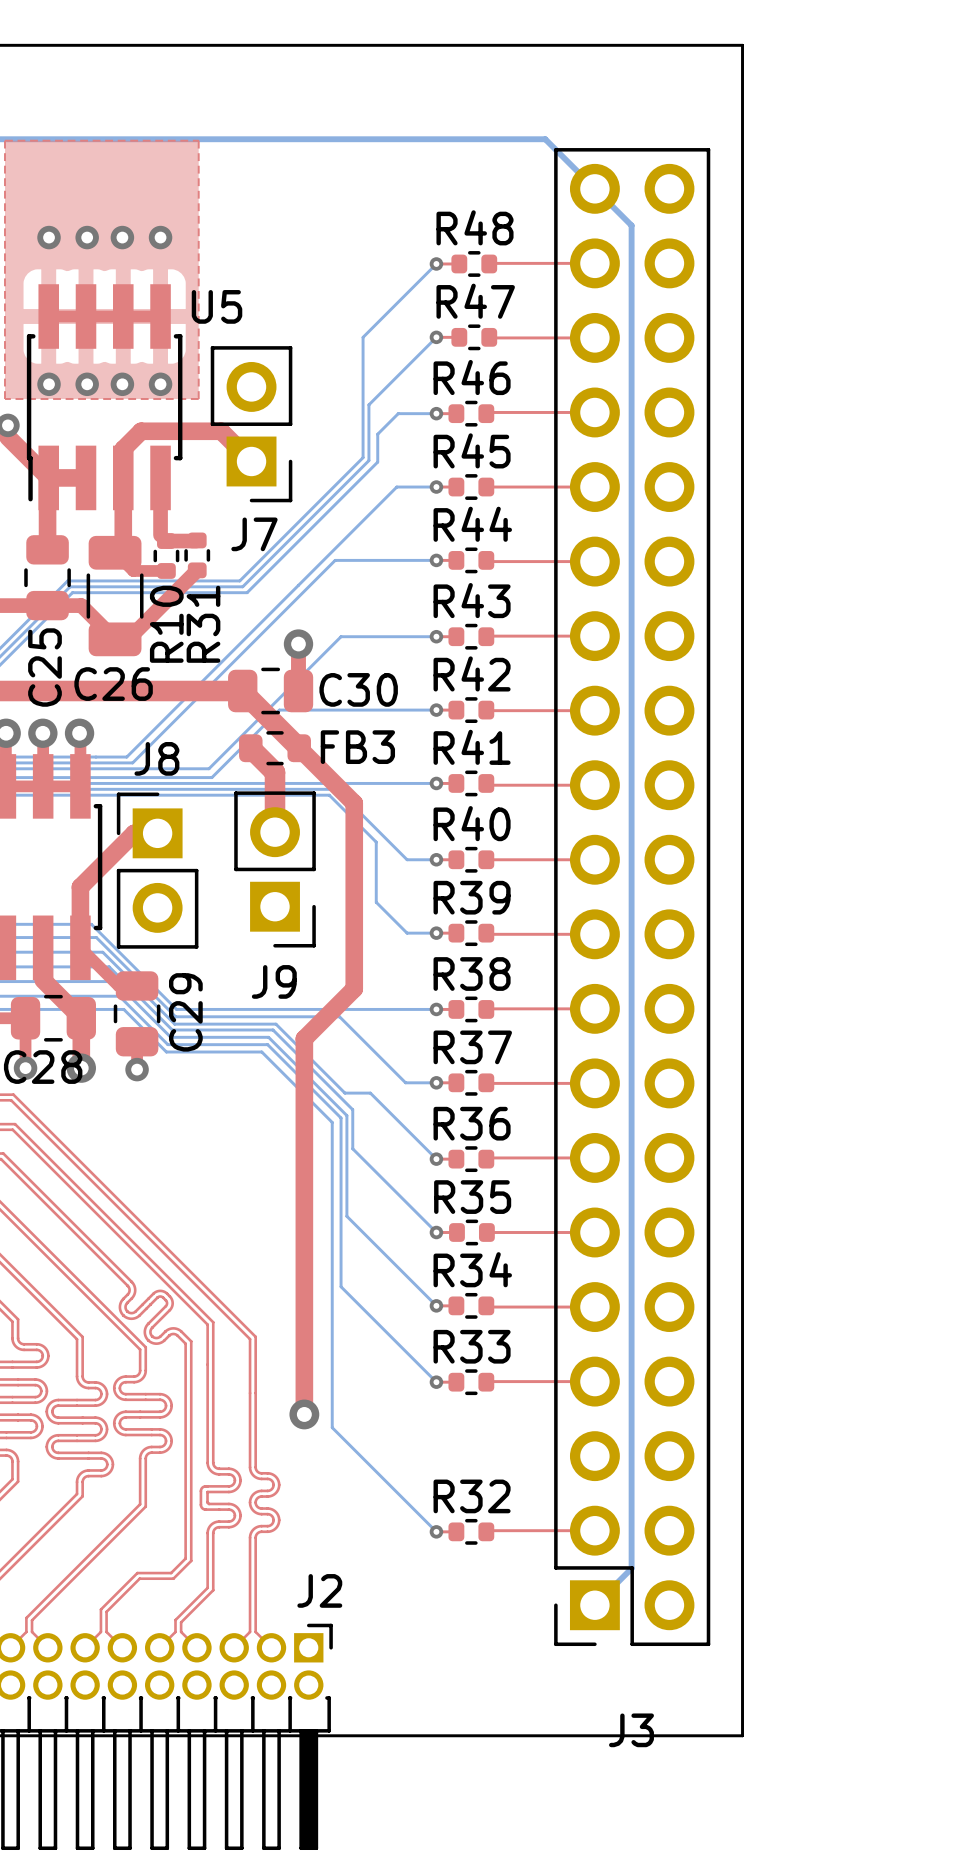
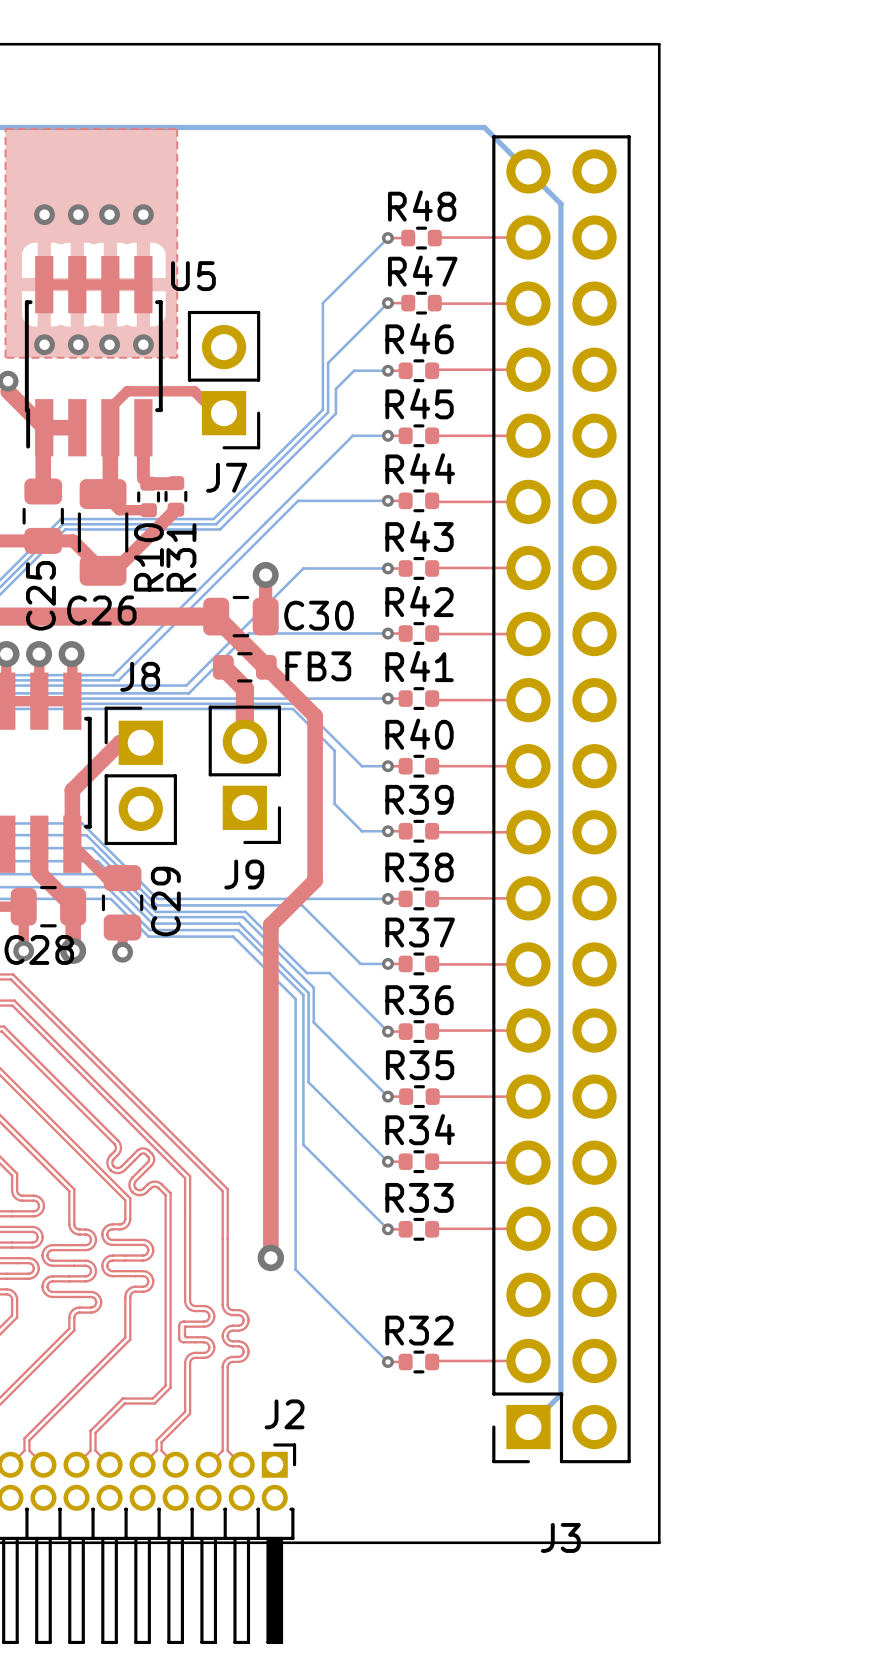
top track: none -> (110, 408) (127, 391) (194, 391) (216, 413)
top track: (251, 461) (221, 431) (141, 431) (123, 449) (123, 477) -> none

